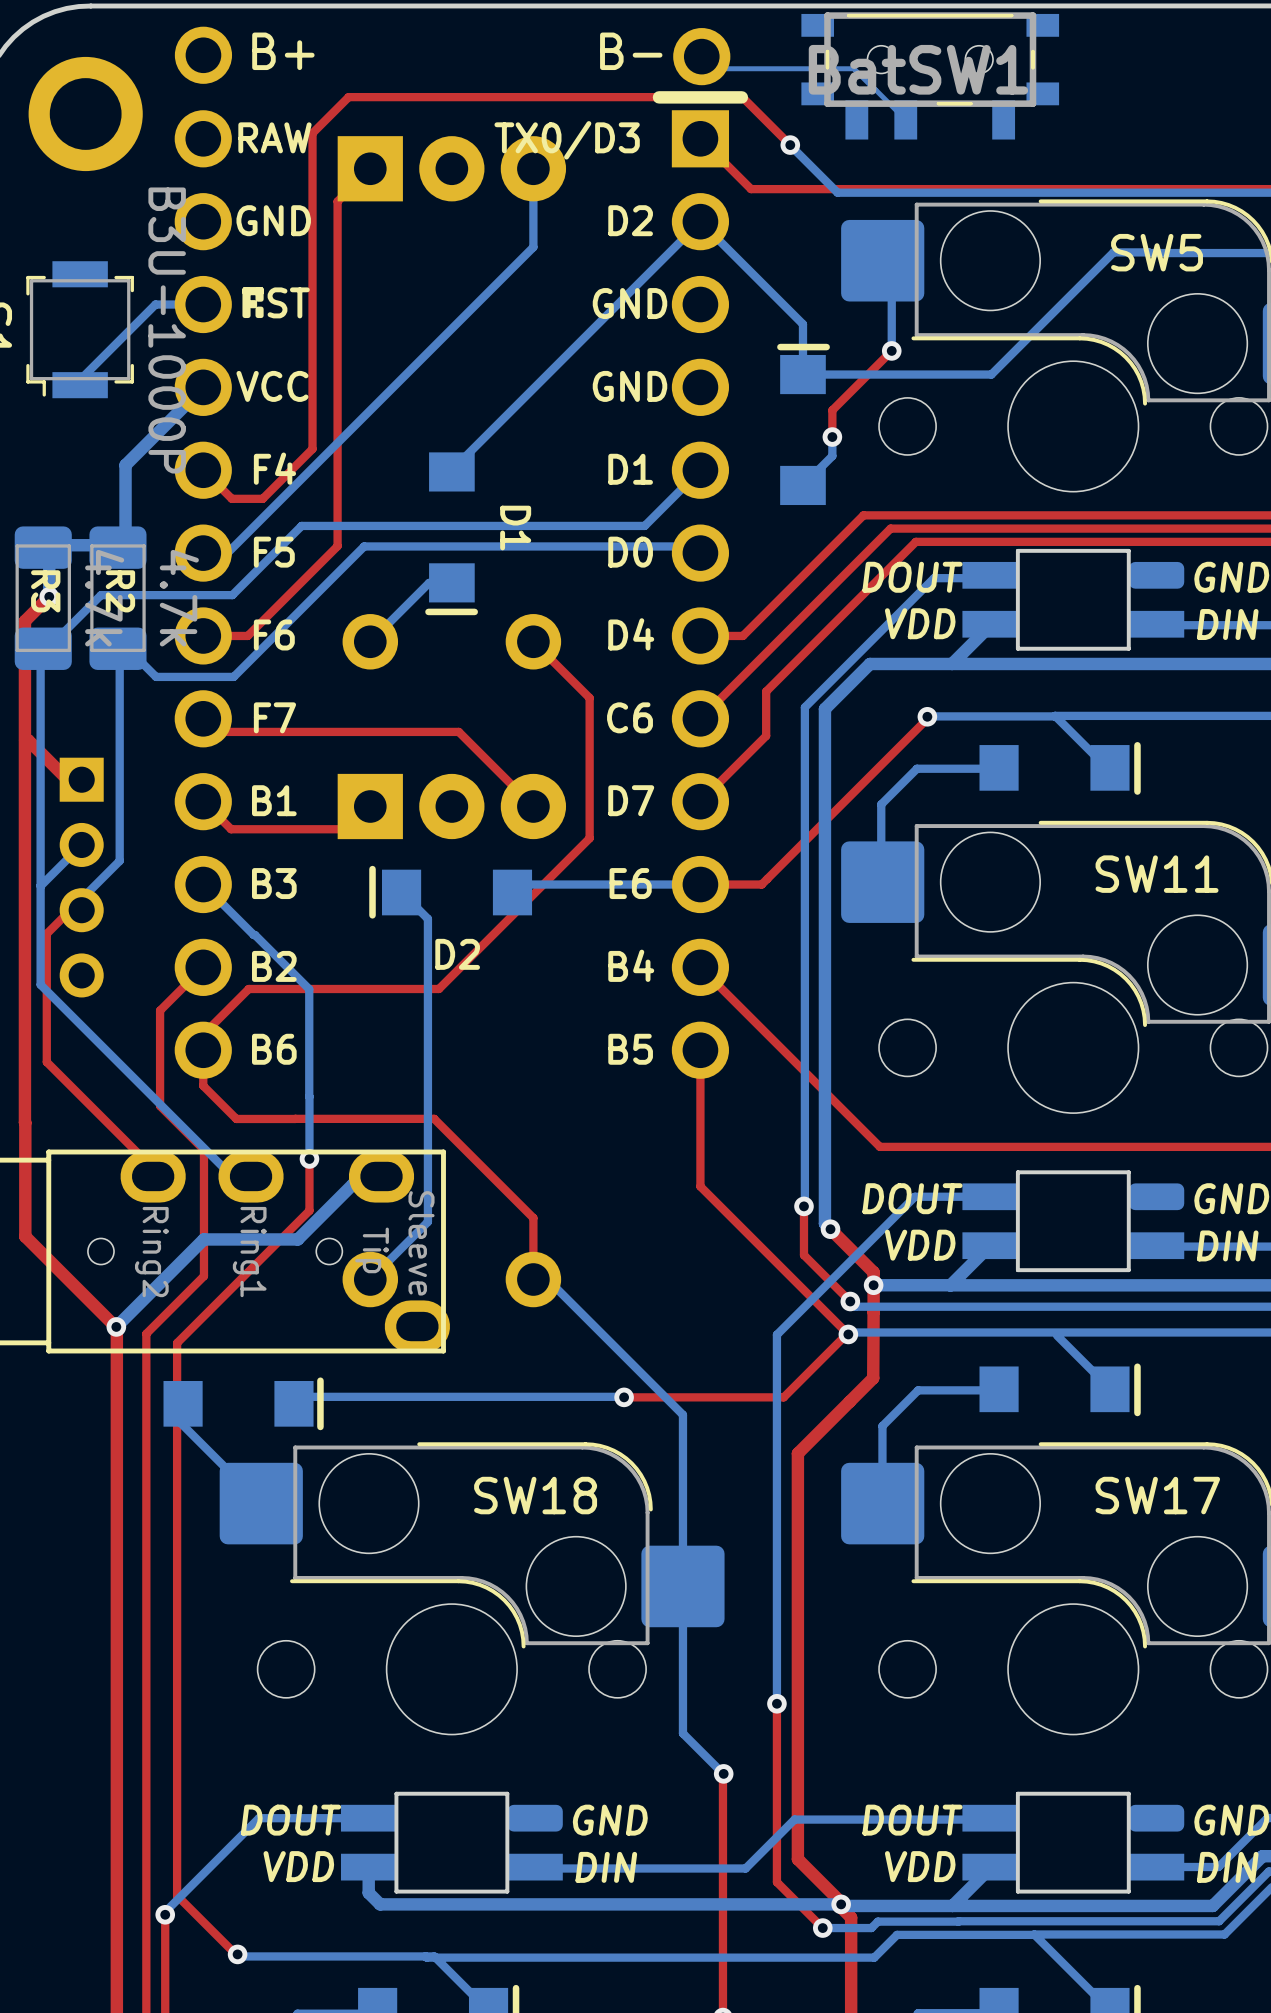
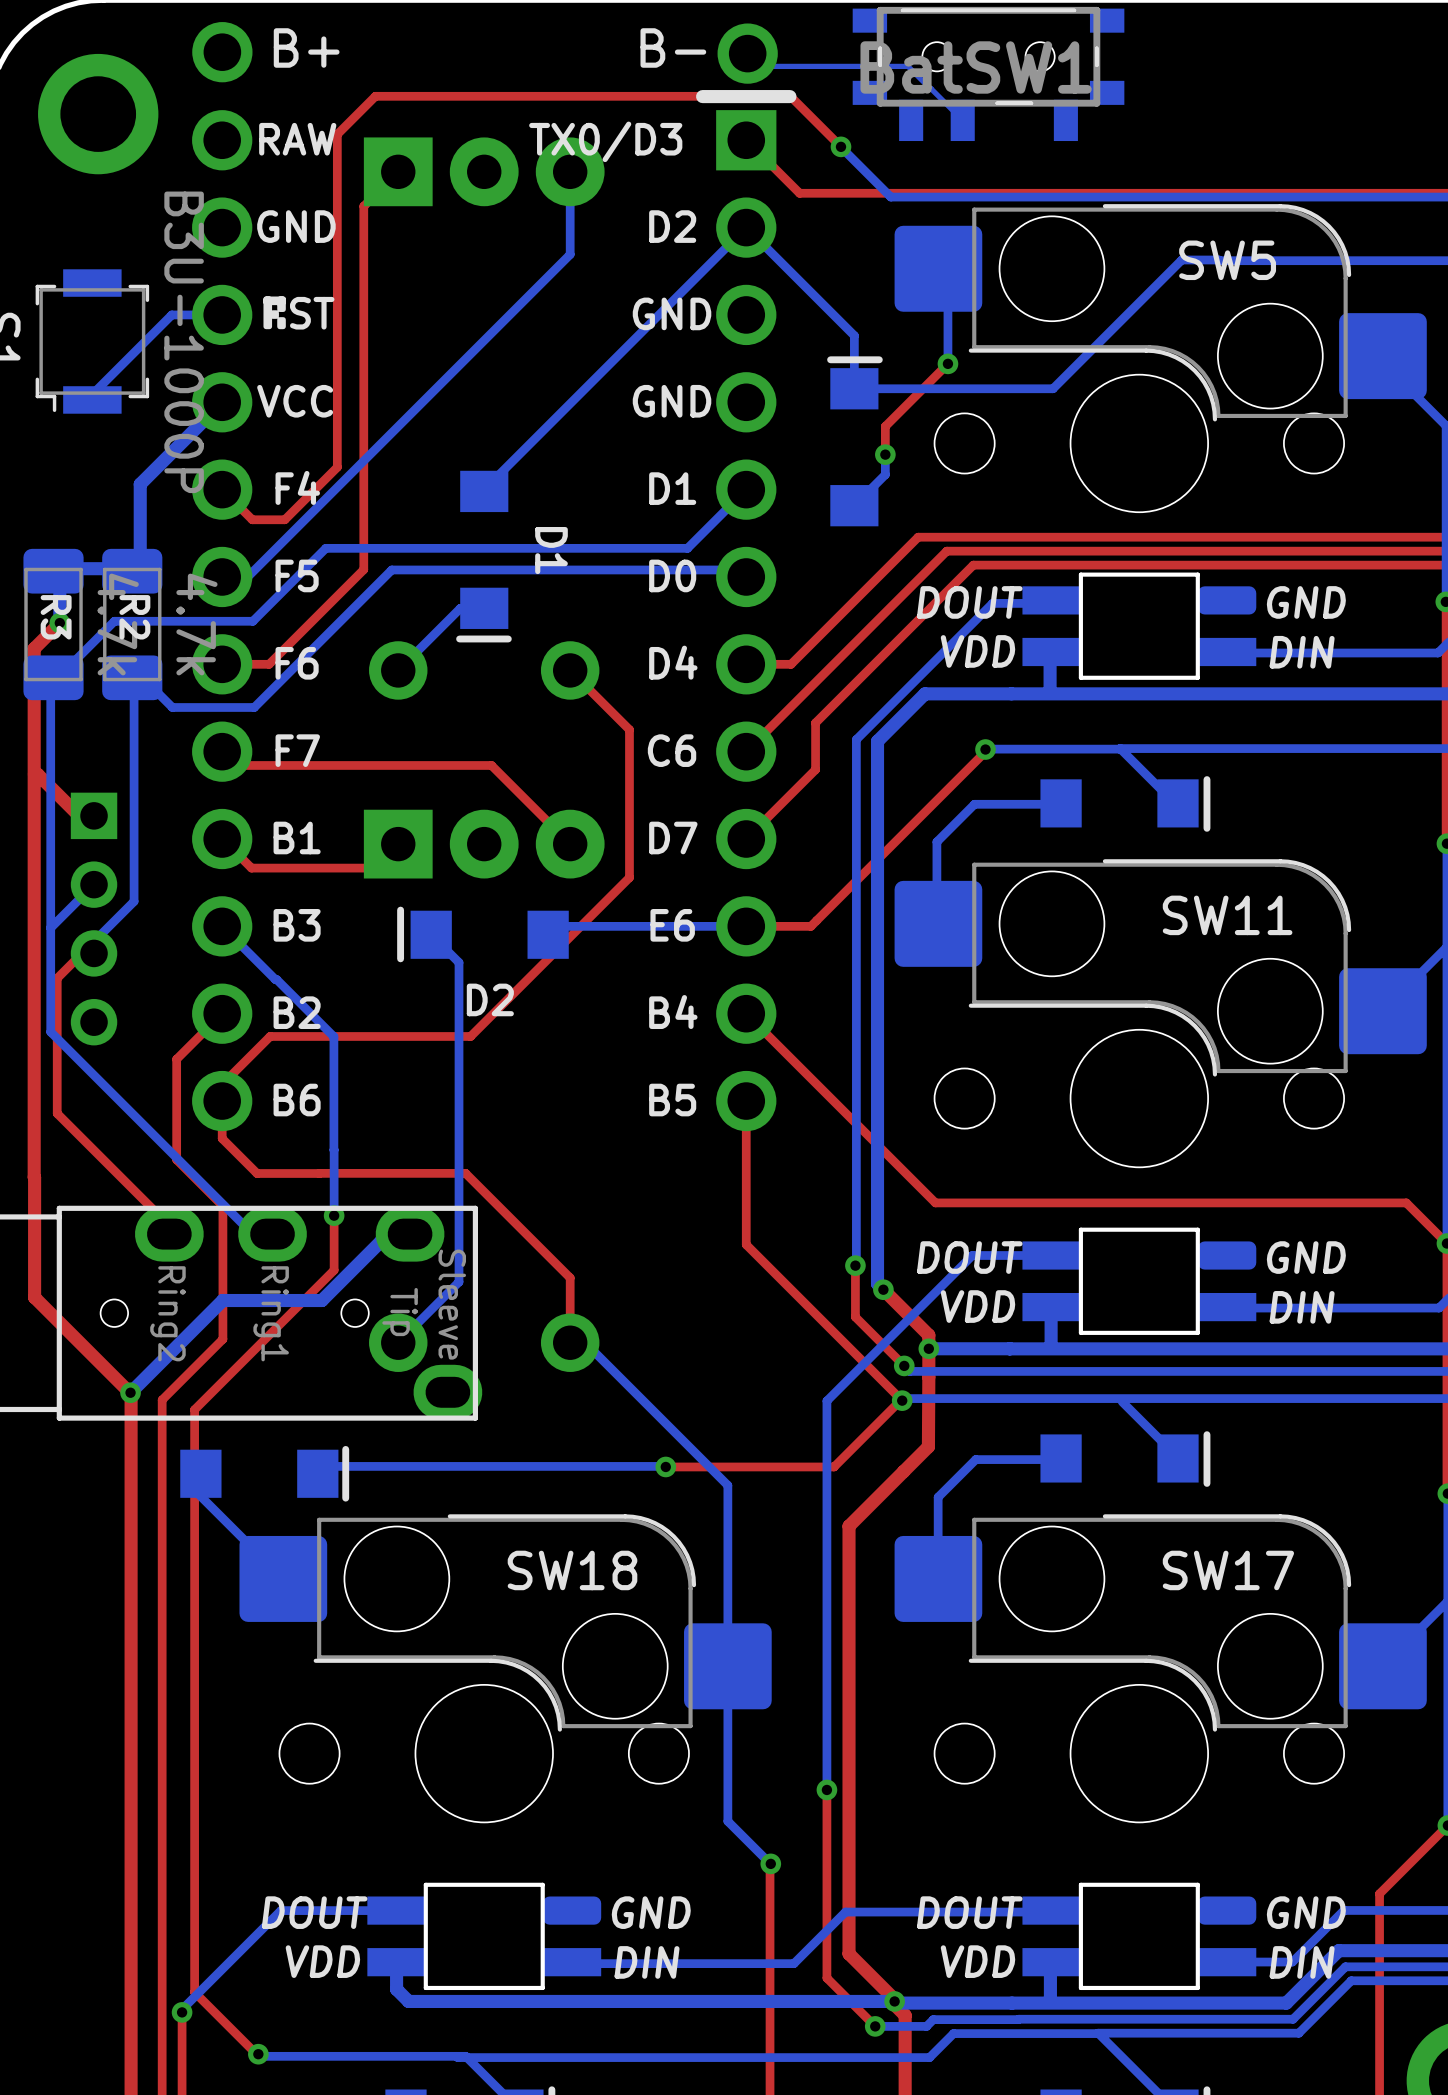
bottom track: none -> (1050, 653) (1050, 690)
bottom track: (989, 626) (952, 663) -> none
bottom track: (988, 1247) (950, 1285) -> none
bottom track: none -> (1051, 1309) (1051, 1346)
bottom track: (990, 1868) (952, 1905) -> none
bottom track: none -> (1050, 1964) (1050, 2001)

